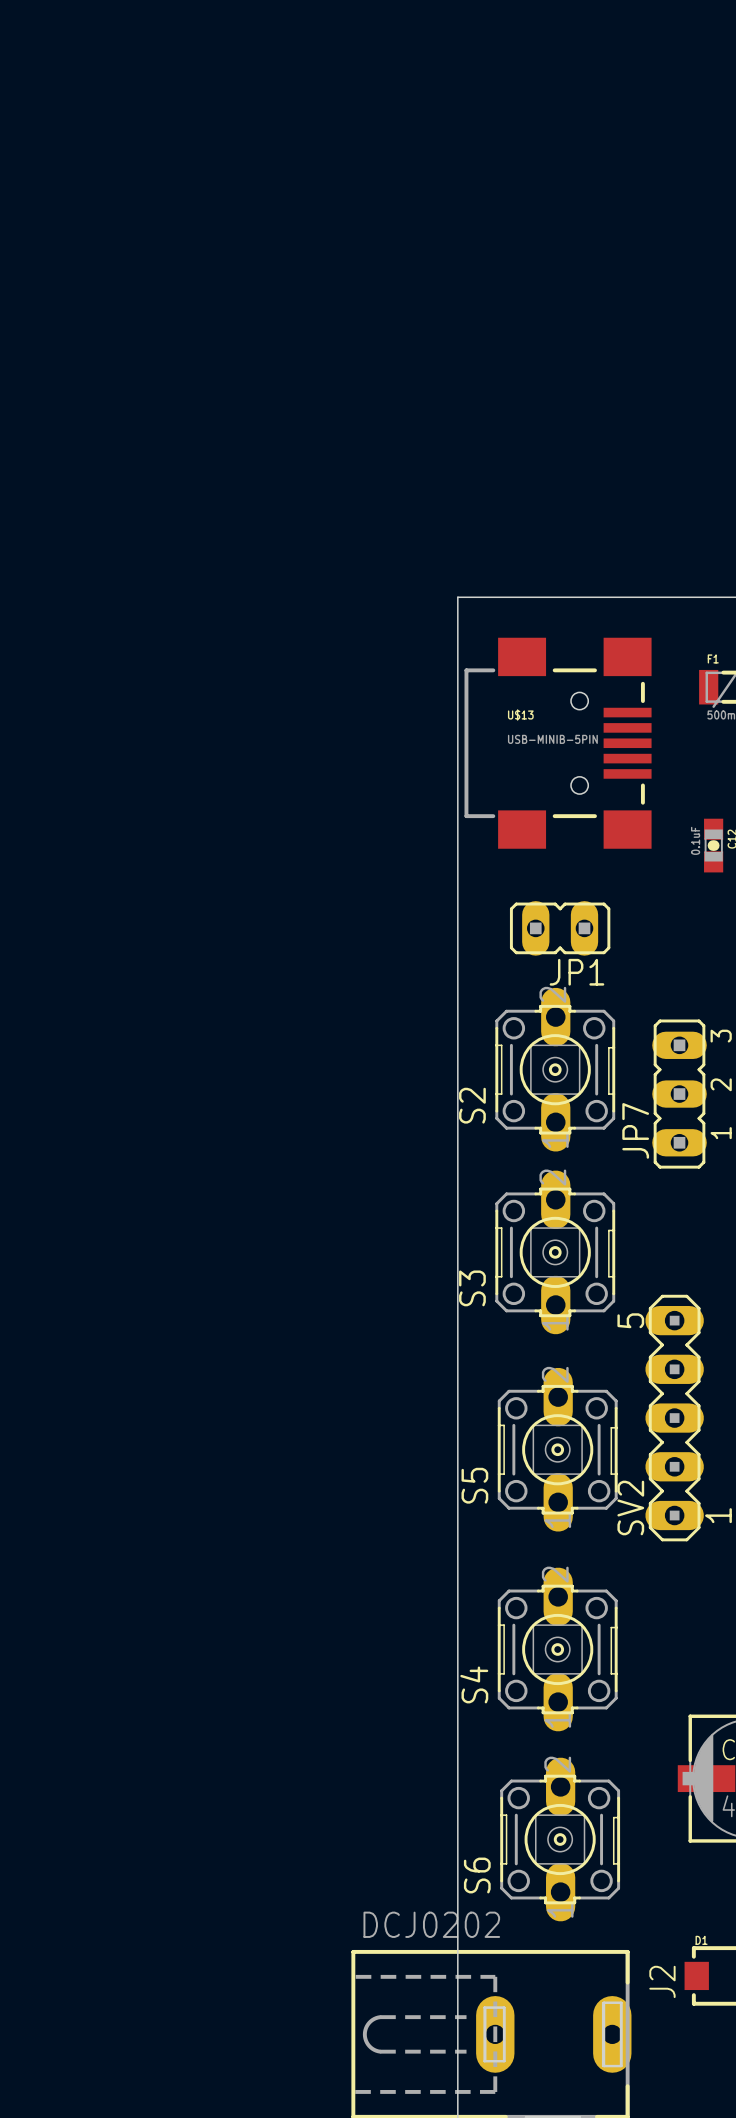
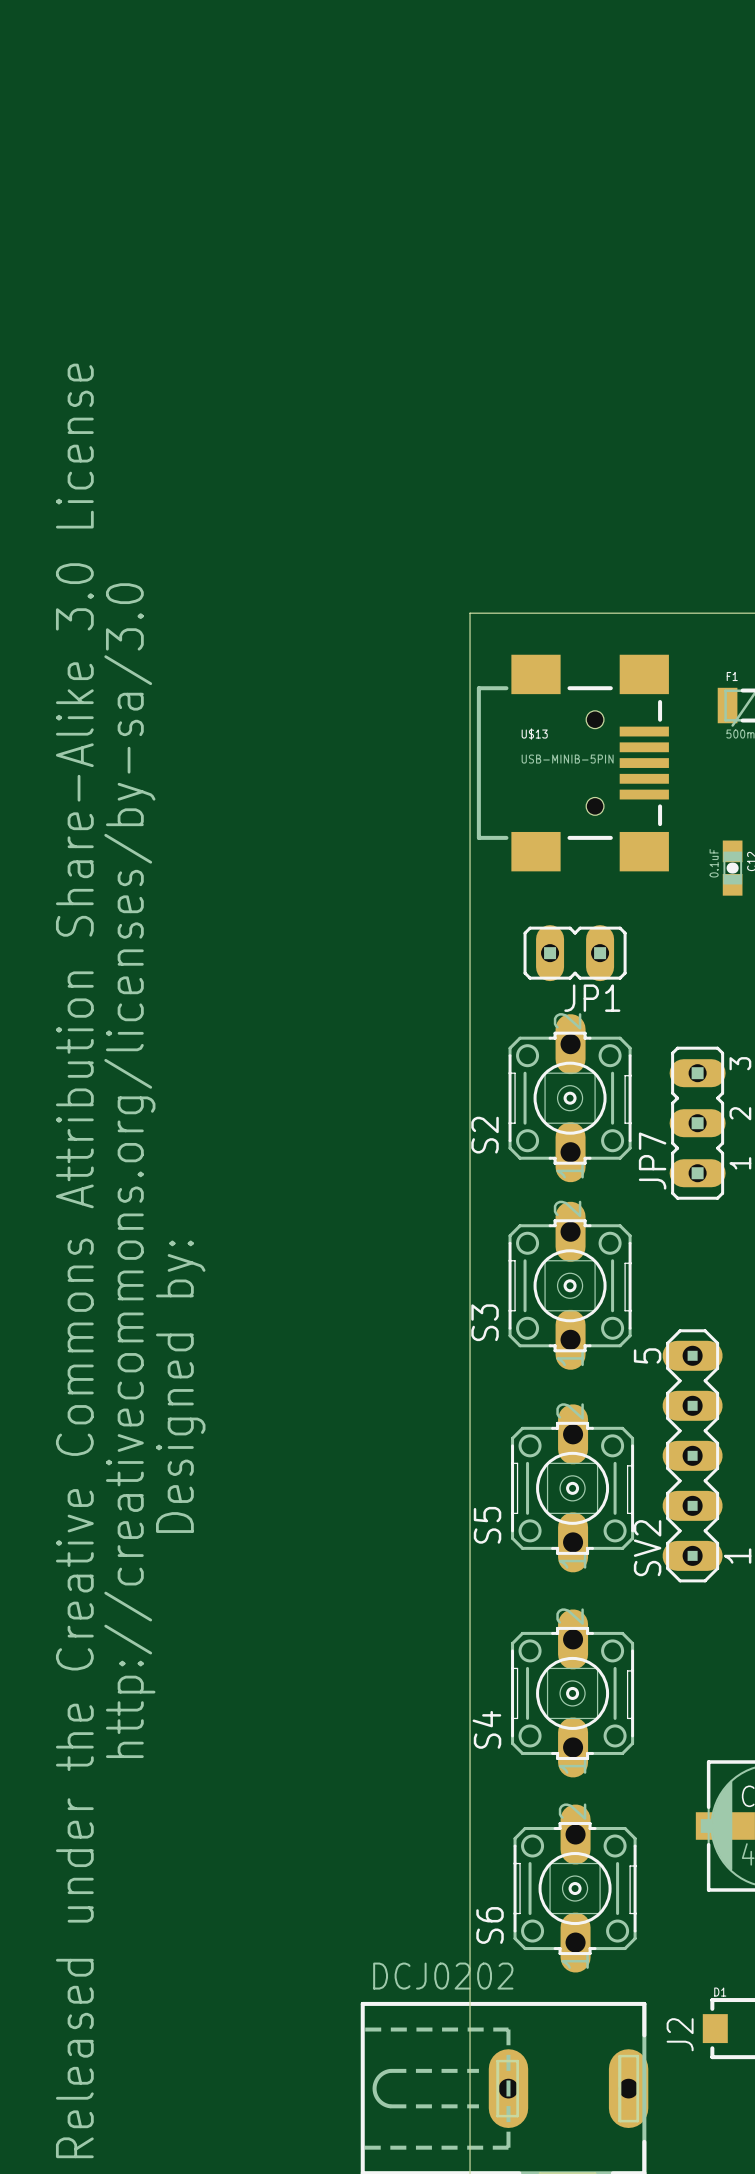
drawing: none -> [55, 363, 206, 2159]

